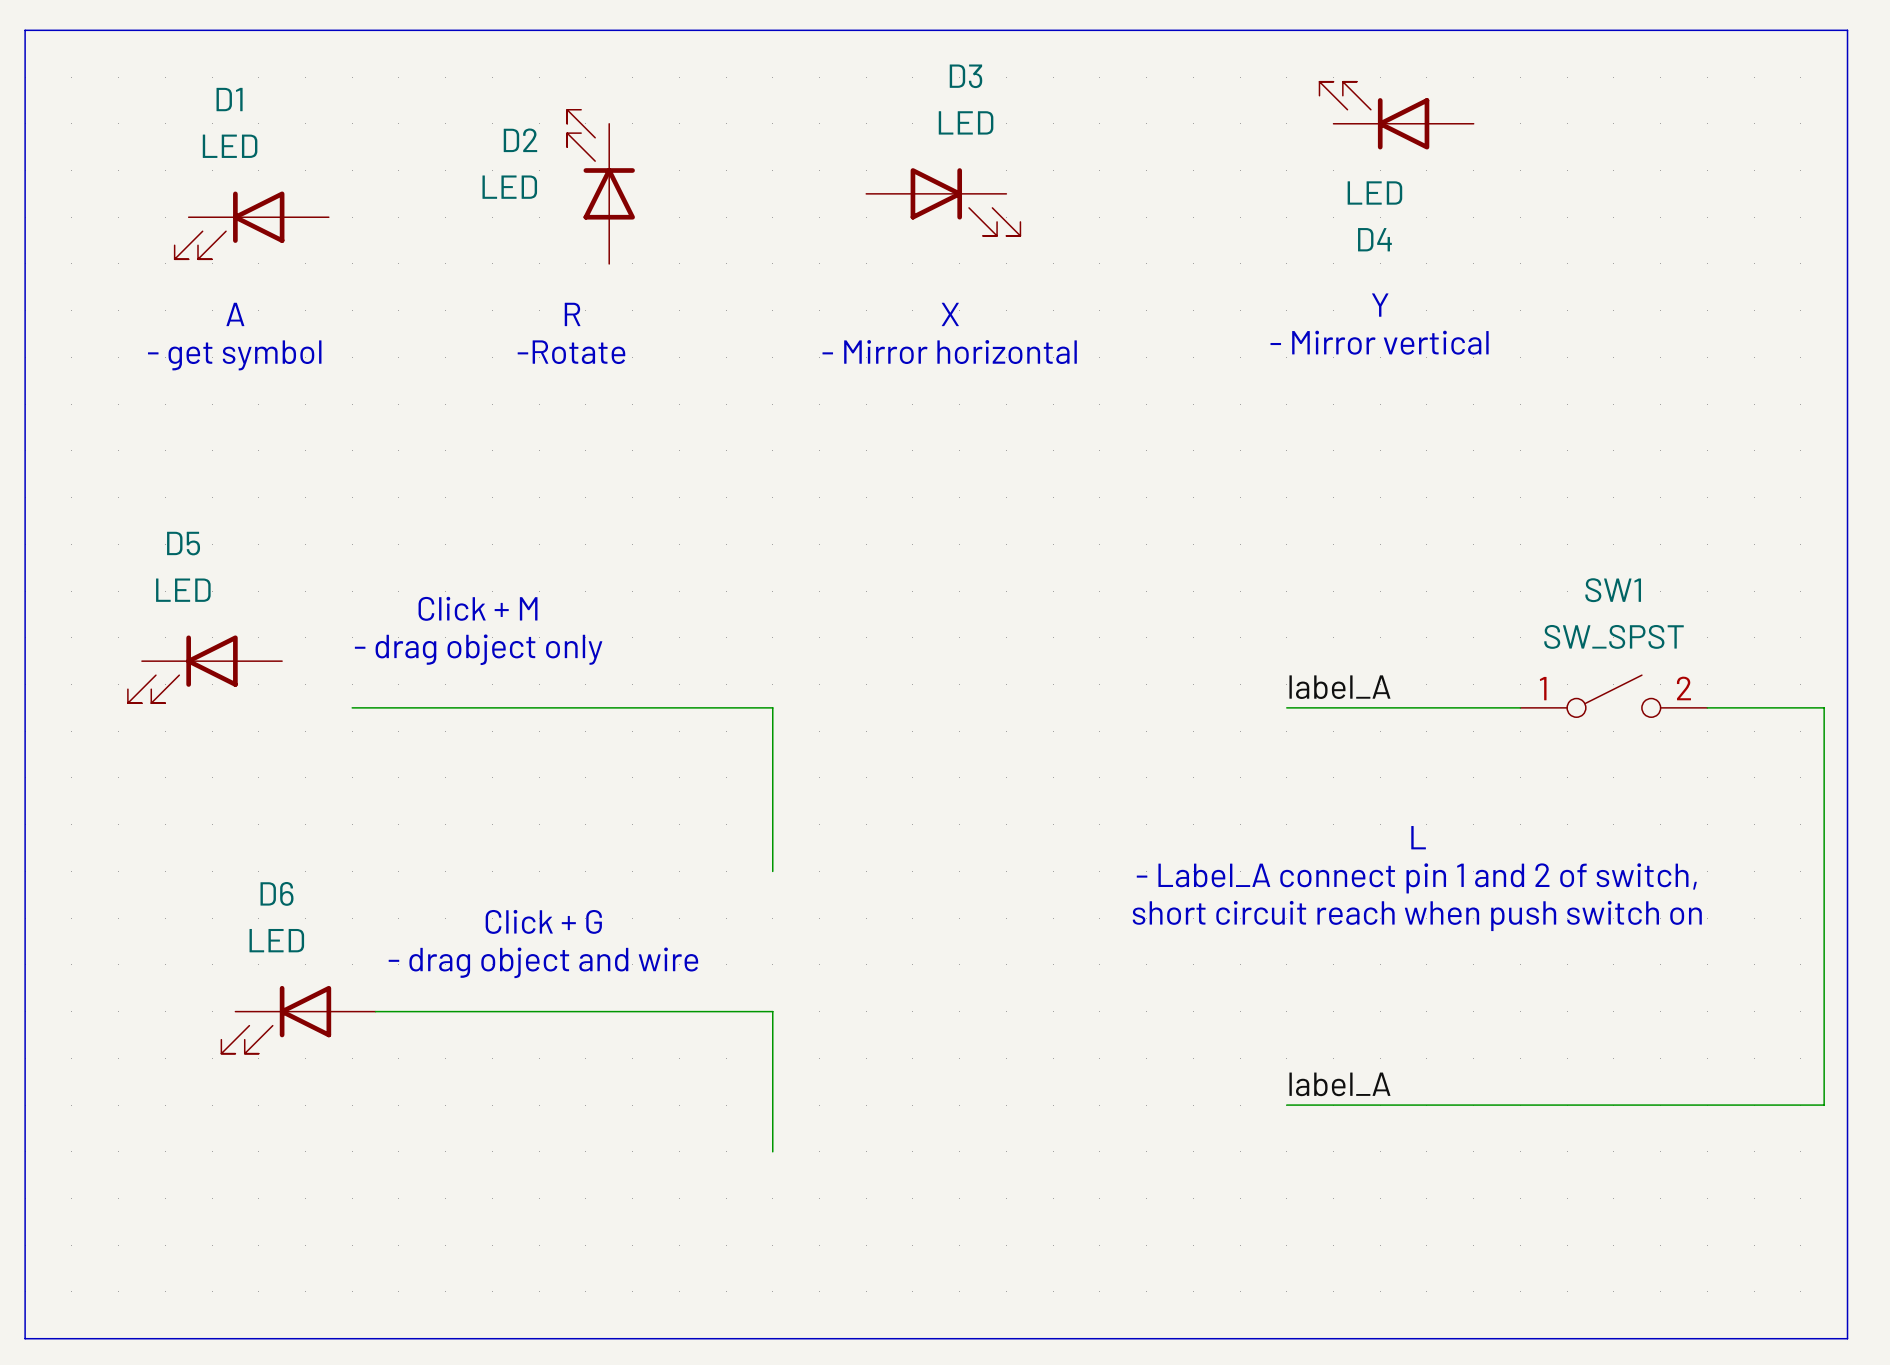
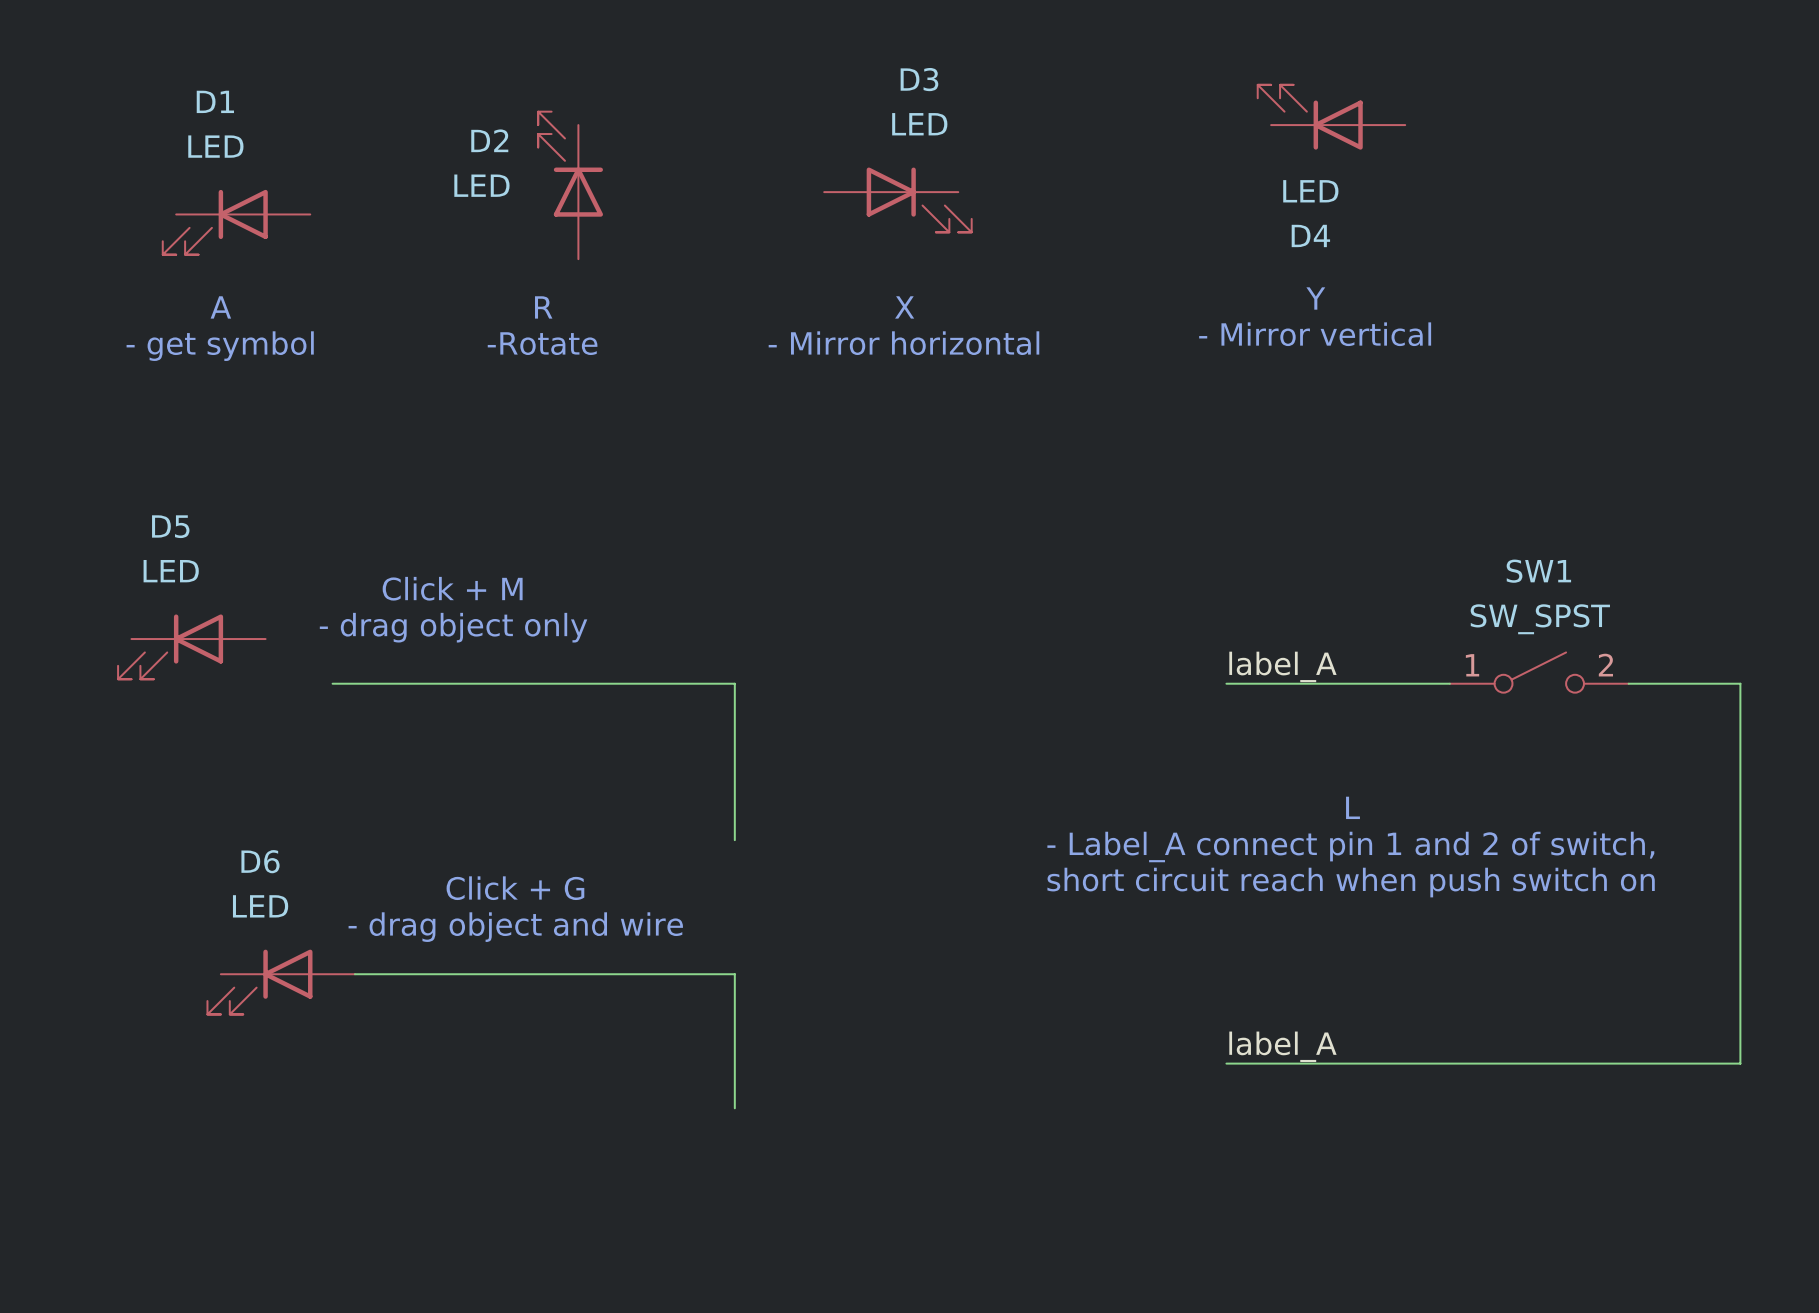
line: (25, 30) (1847, 30) (1847, 1338) (25, 1338) (25, 30) -> none

